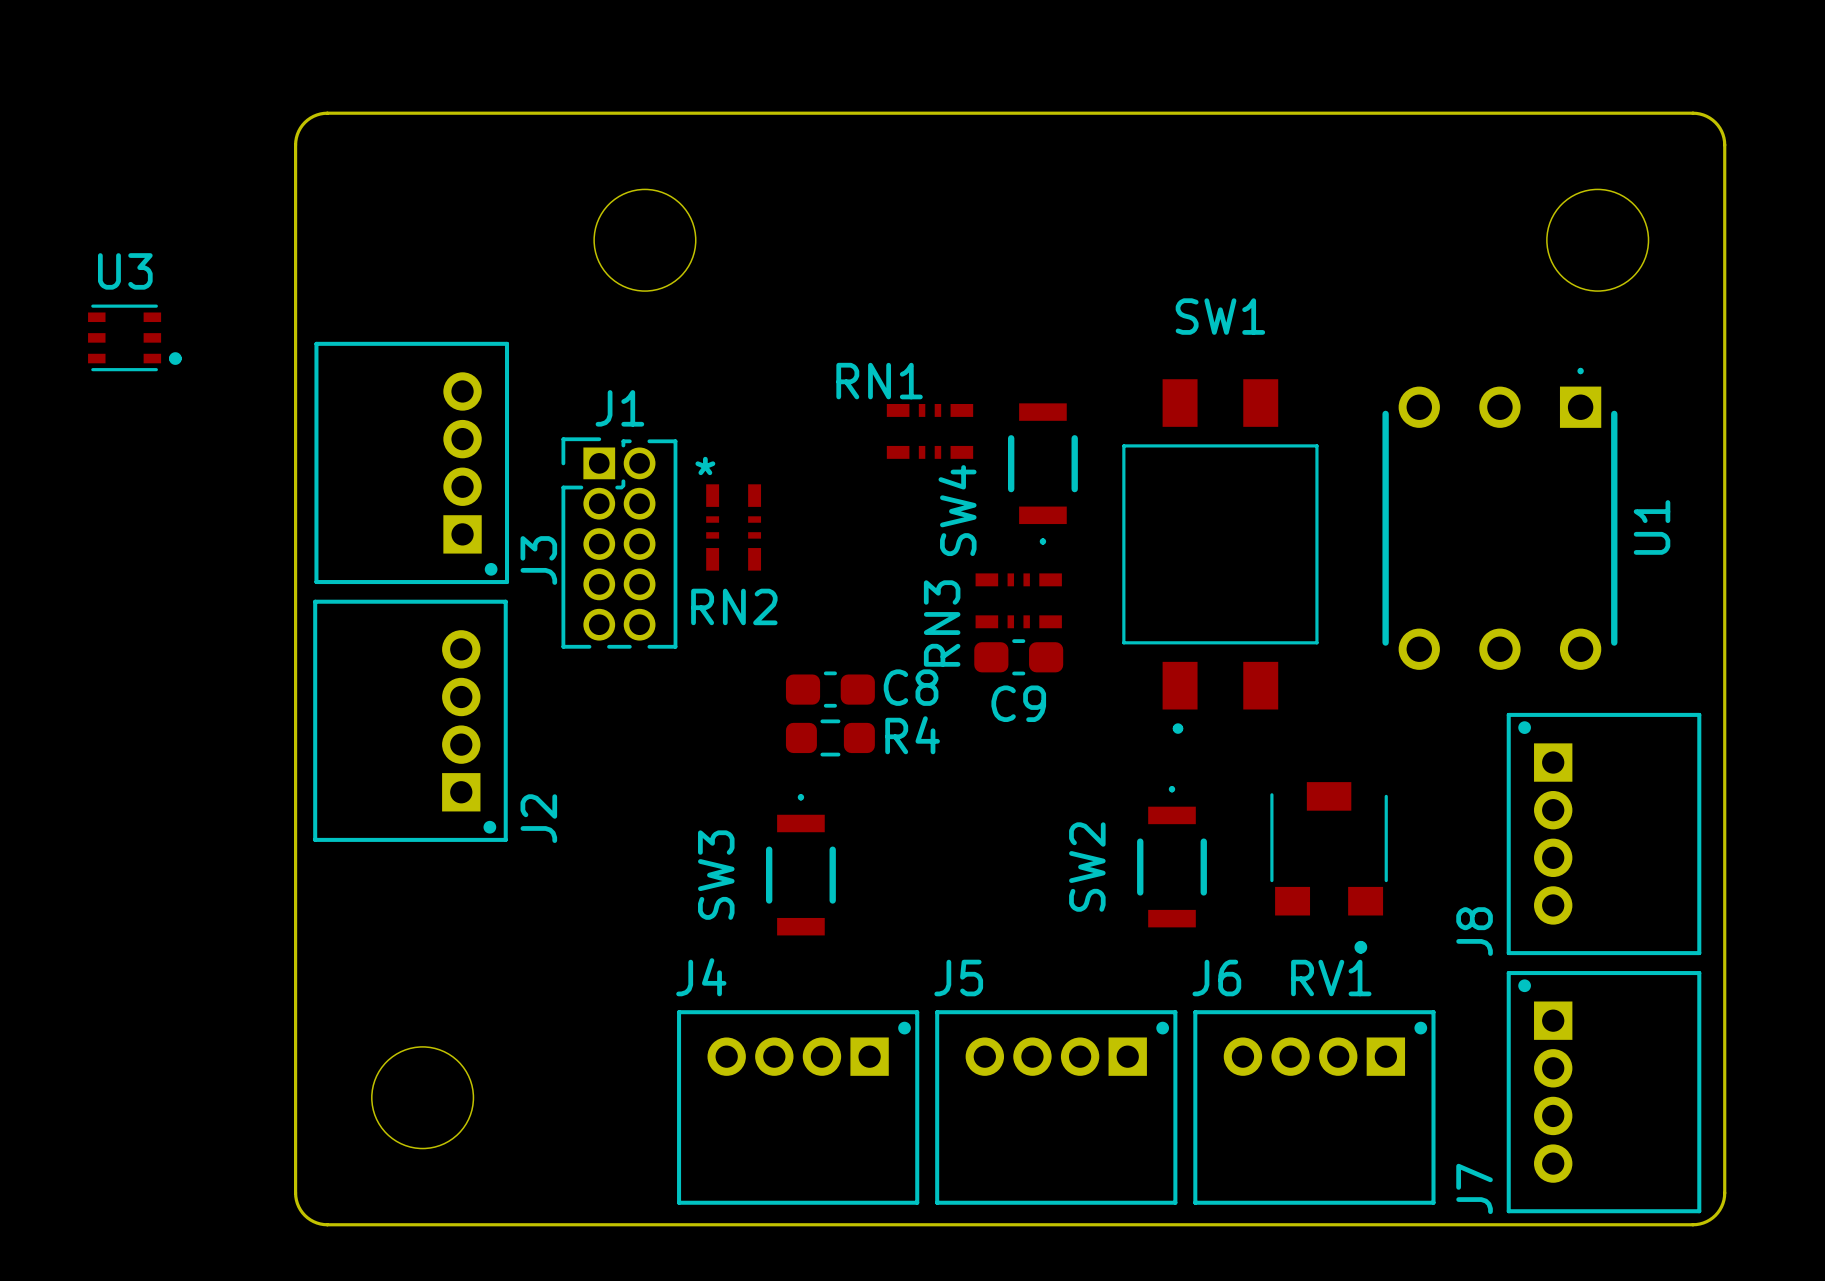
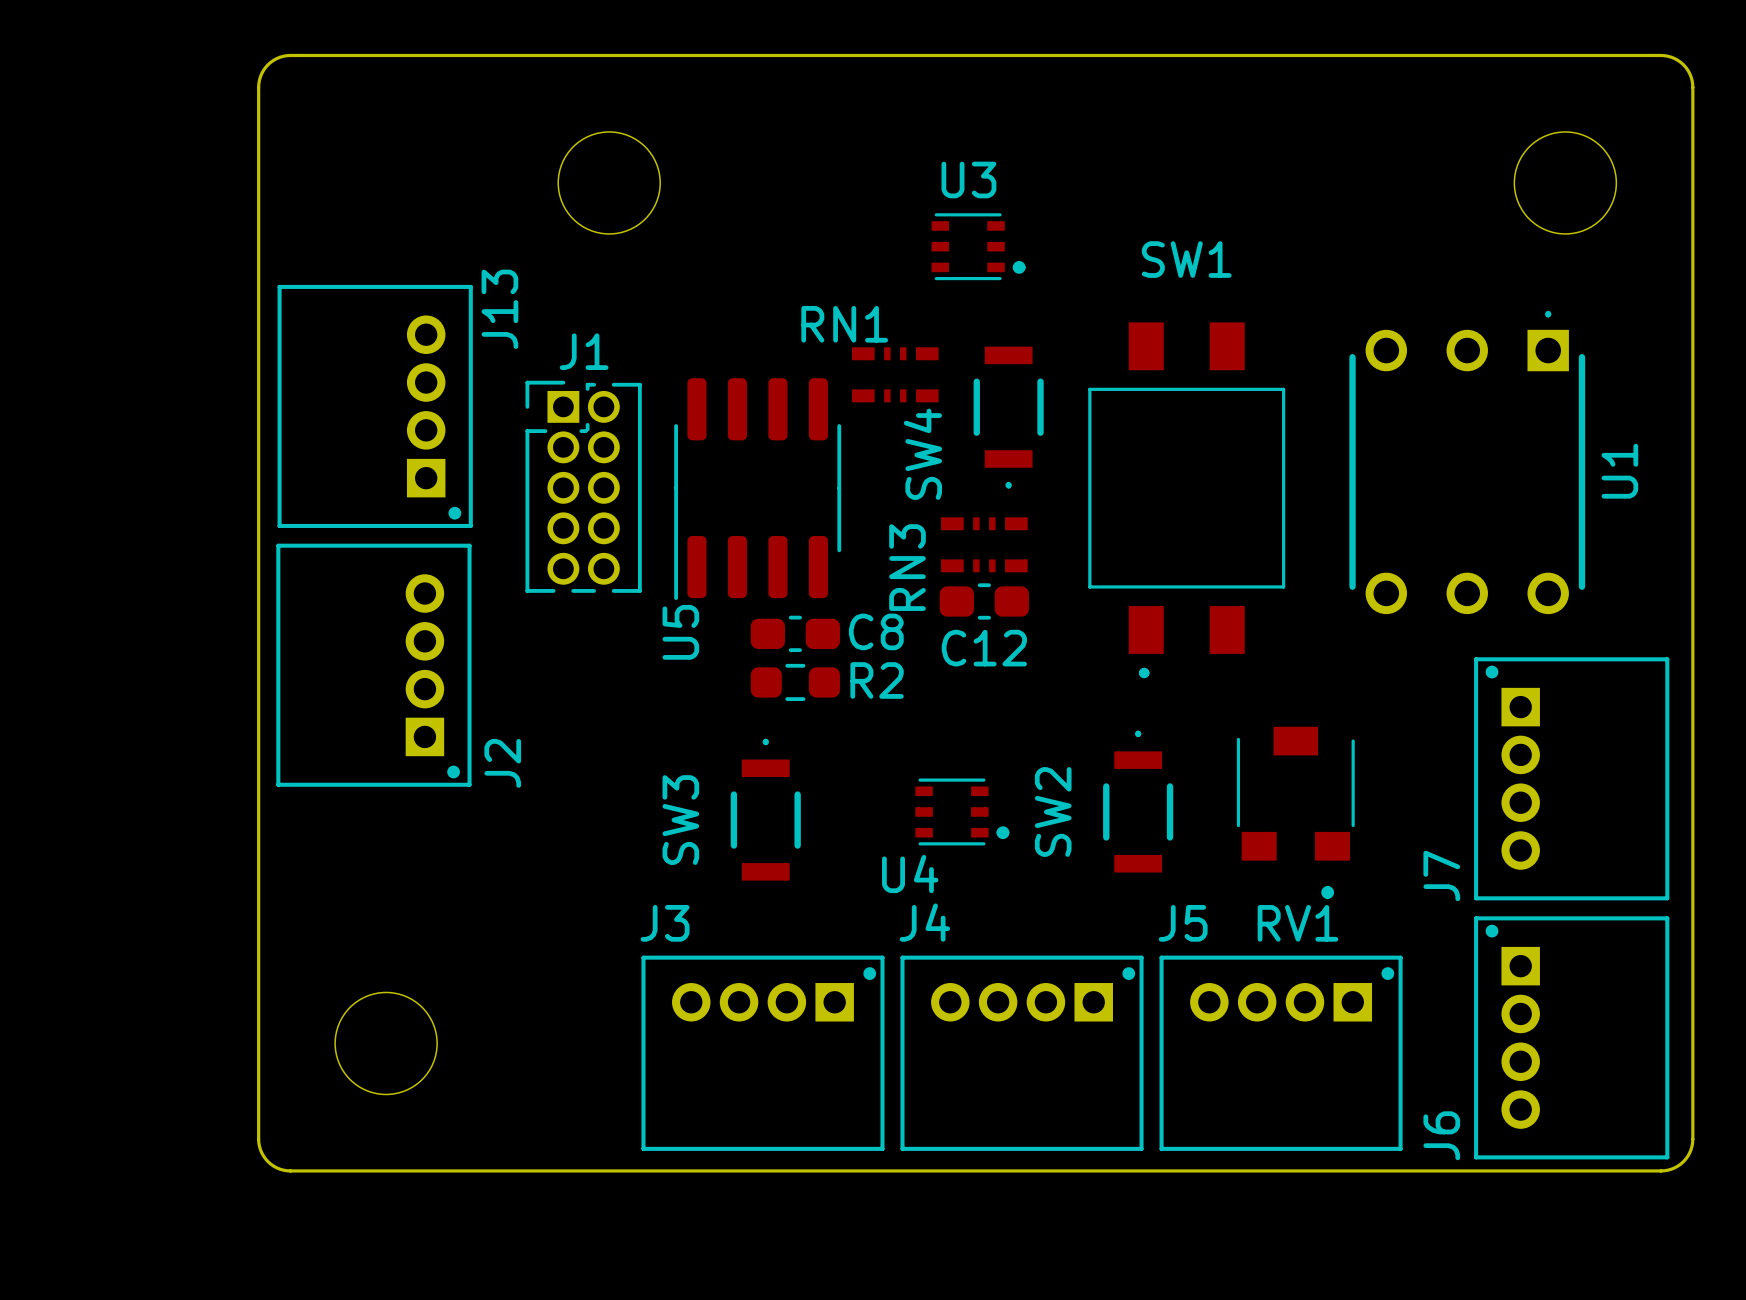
U3 position: (134, 337) -> (978, 246)
RN2: (733, 527) -> none
U5: none -> (757, 489)
J3 name: J3 (538, 560) -> J13 (499, 309)
C9 name: C9 (1018, 703) -> C12 (984, 648)
R4 name: R4 (912, 735) -> R2 (877, 680)
U4: none -> (962, 811)
J8 name: J8 (1474, 931) -> J7 (1441, 875)
J4 name: J4 (701, 977) -> J3 (665, 923)
J5 name: J5 (958, 978) -> J4 (924, 922)
J6 name: J6 (1216, 978) -> J5 (1183, 923)
J7 name: J7 (1474, 1188) -> J6 (1441, 1135)

